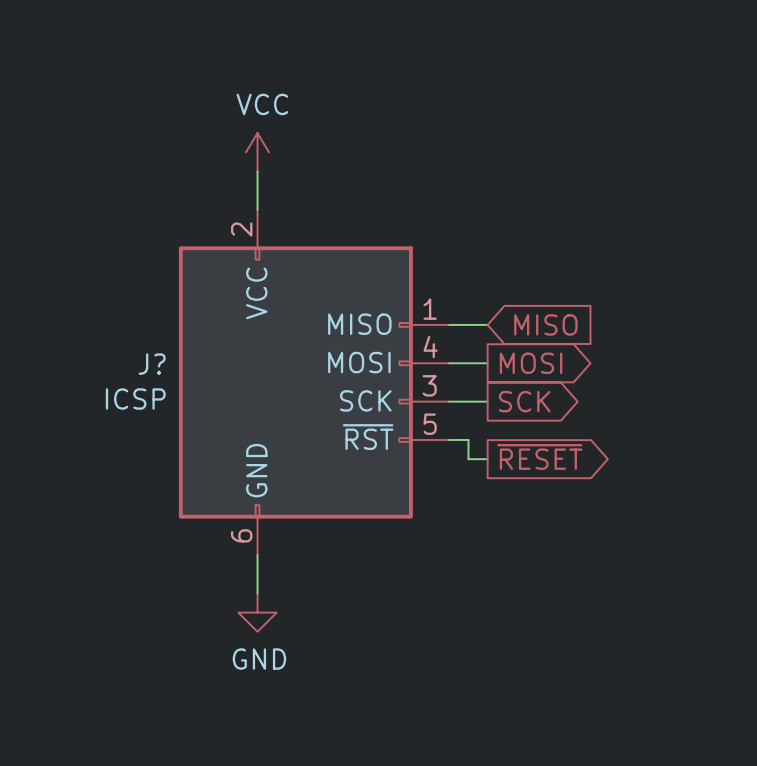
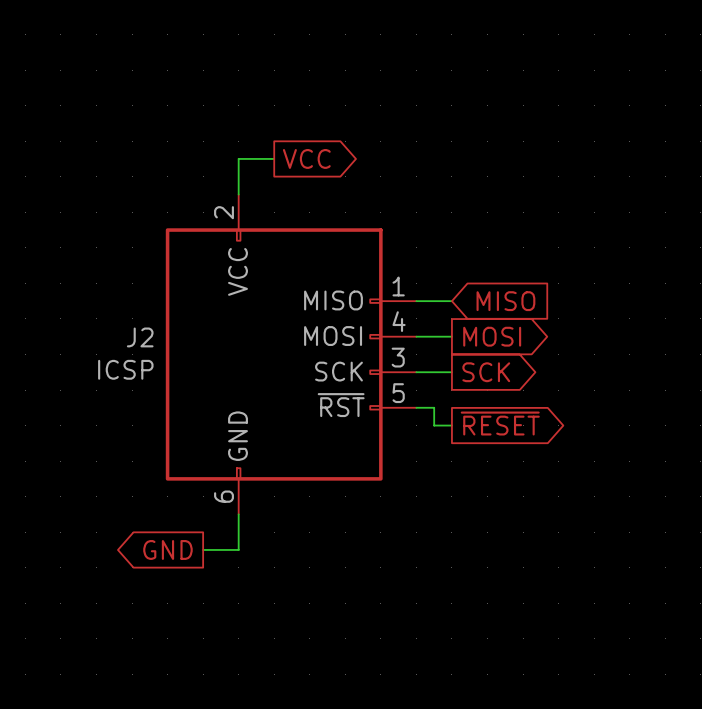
power symbol: VCC (257, 152) -> none
wire: none -> (238, 158) (274, 158)
global label: none -> VCC (306, 158)
J? name: J? (152, 364) -> J2 (140, 337)
global label: none -> GND (167, 549)
wire: none -> (203, 549) (238, 549)
power symbol: GND (257, 612) -> none

